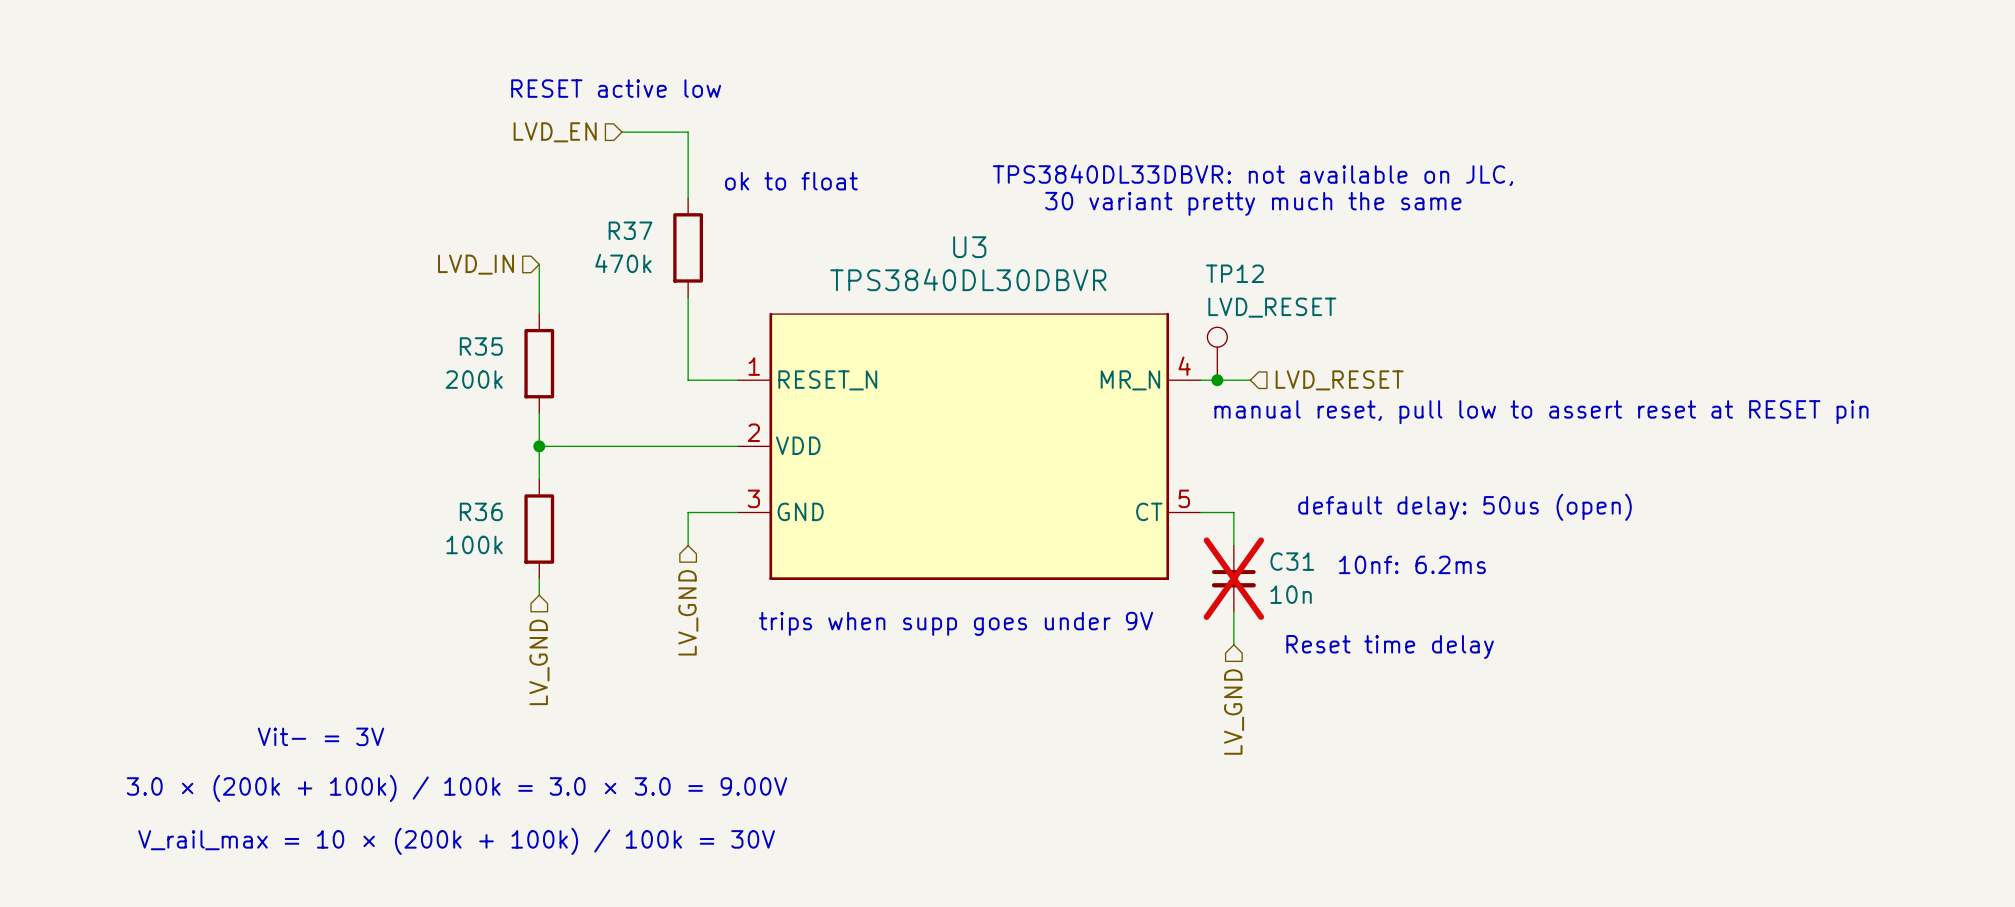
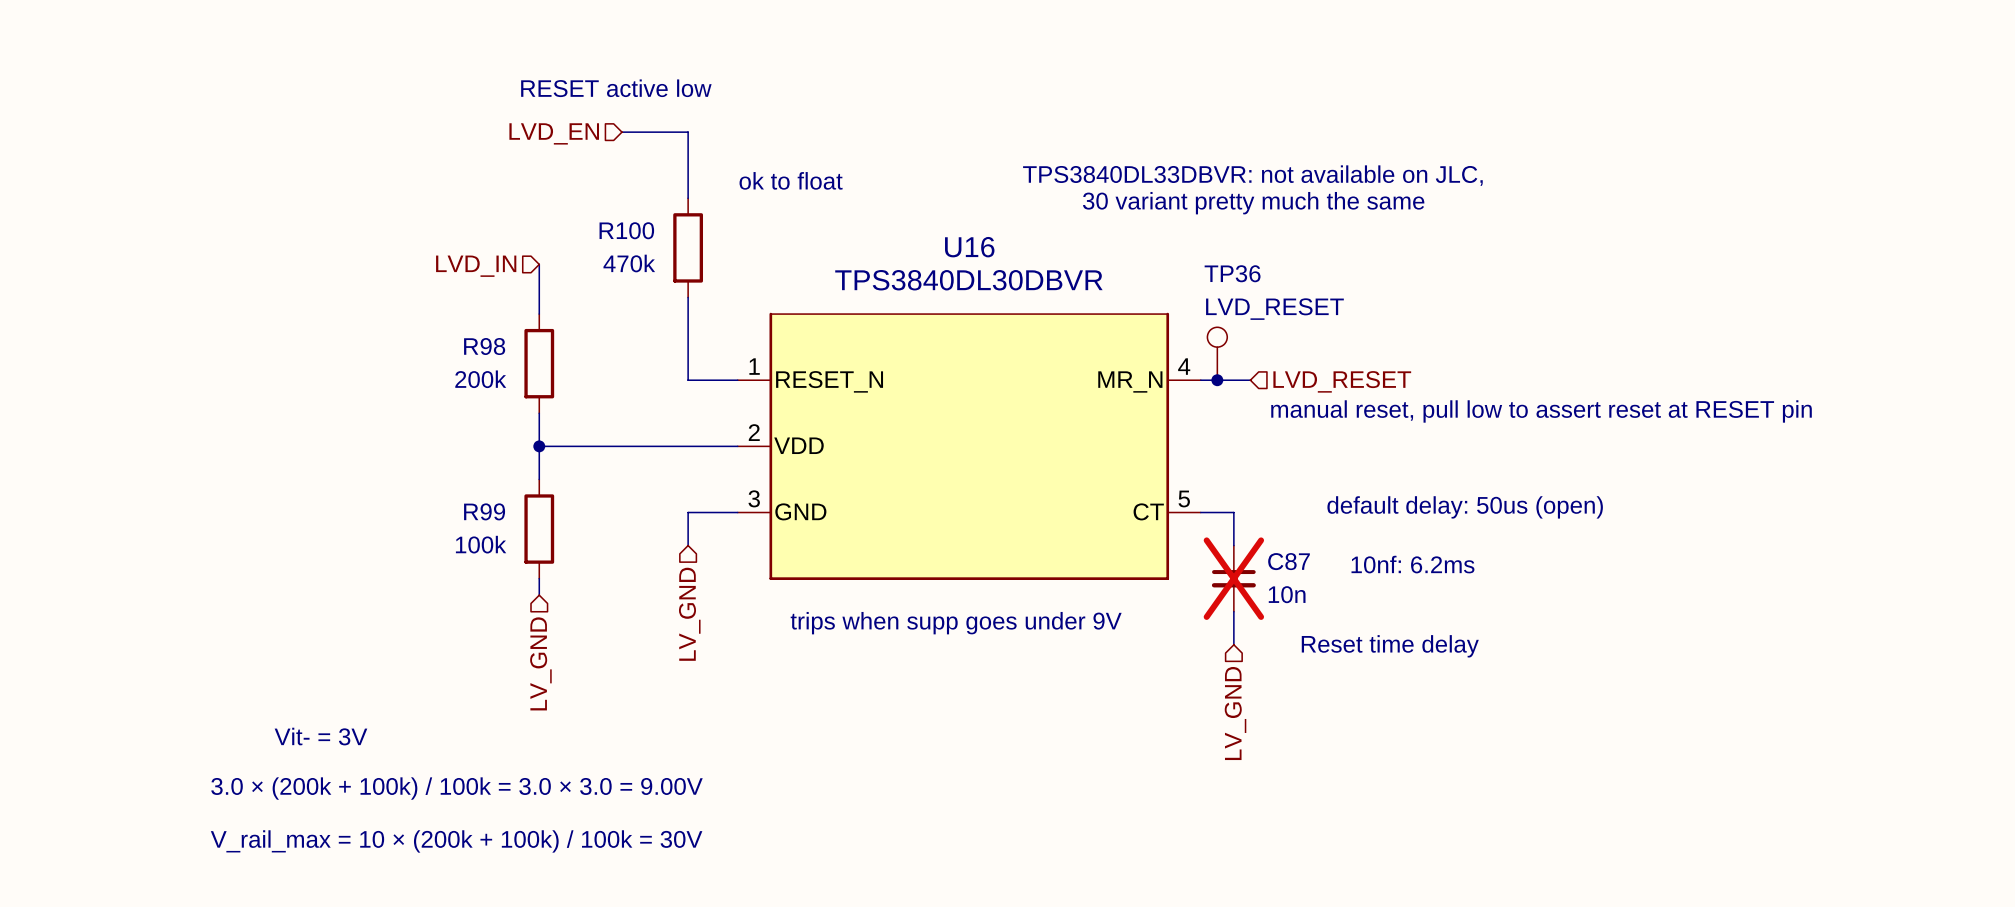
R37 name: R37 (630, 230) -> R100 (626, 230)
U3 name: U3 (969, 247) -> U16 (969, 247)
TP12 name: TP12 (1234, 273) -> TP36 (1232, 273)
R35 name: R35 (481, 346) -> R98 (484, 346)
R36 name: R36 (481, 511) -> R99 (484, 511)
C31 name: C31 (1292, 561) -> C87 (1289, 561)

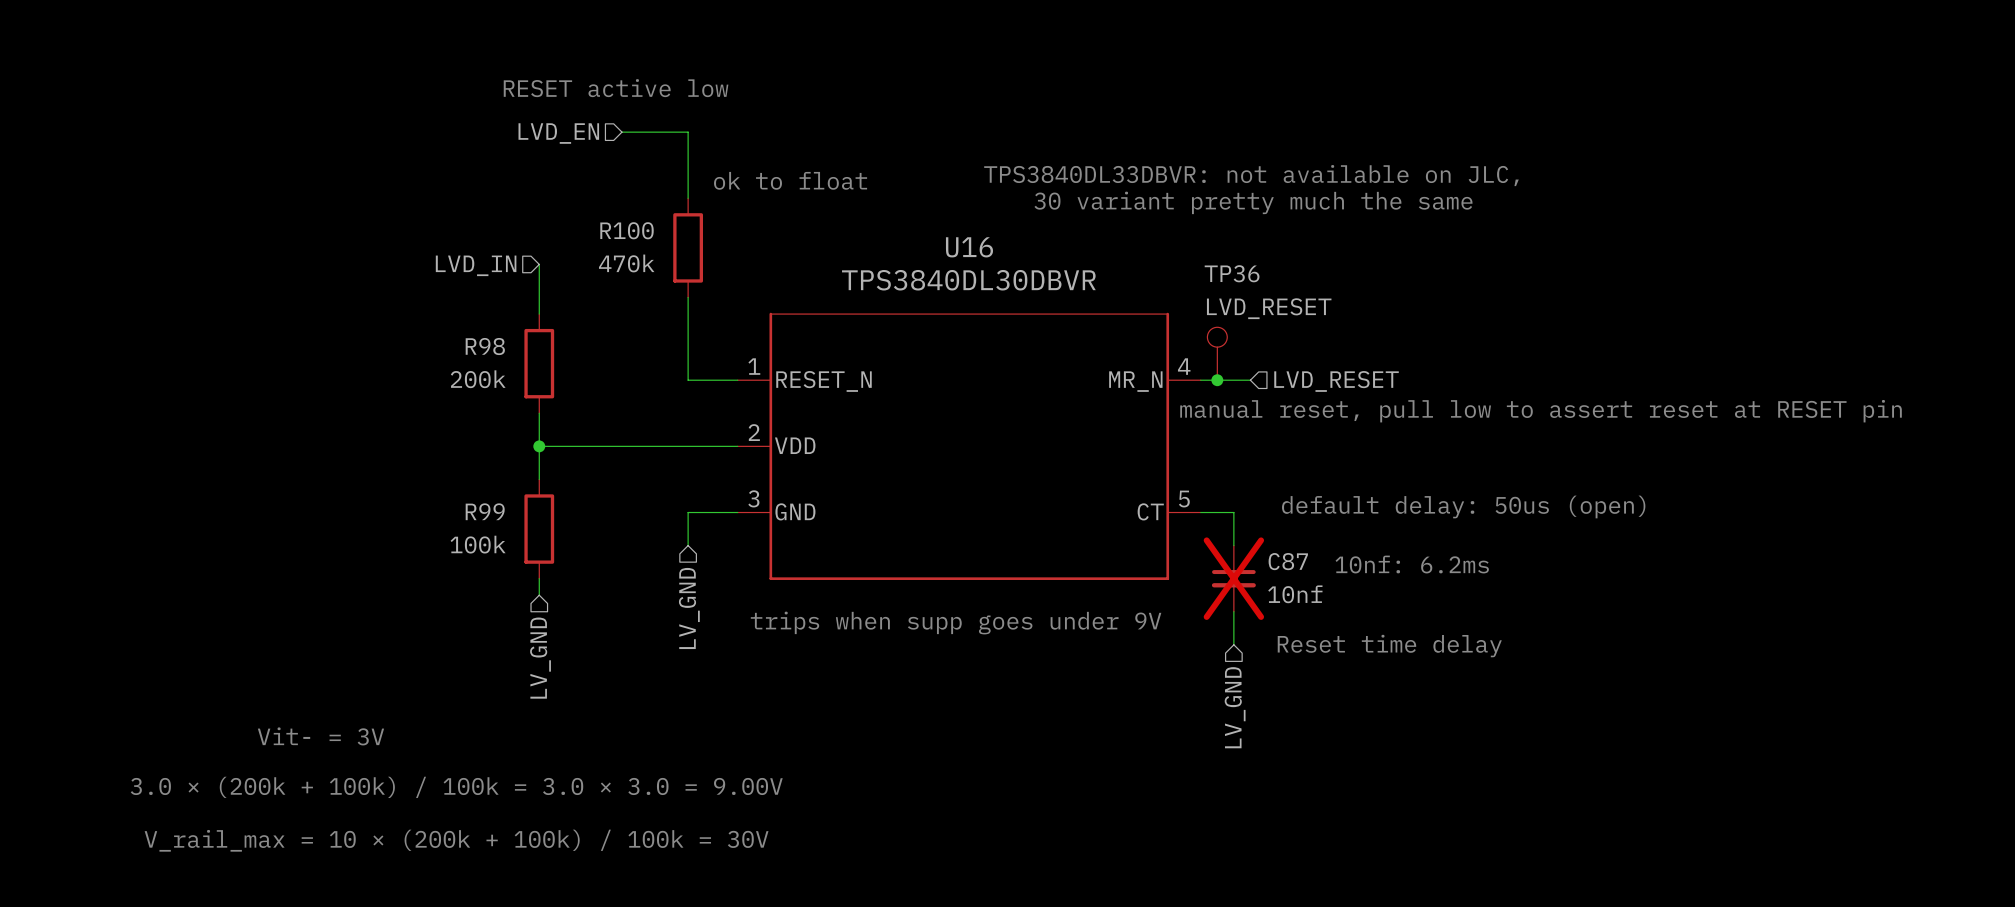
C87 value: 10n (1287, 594) -> 10nf (1295, 594)

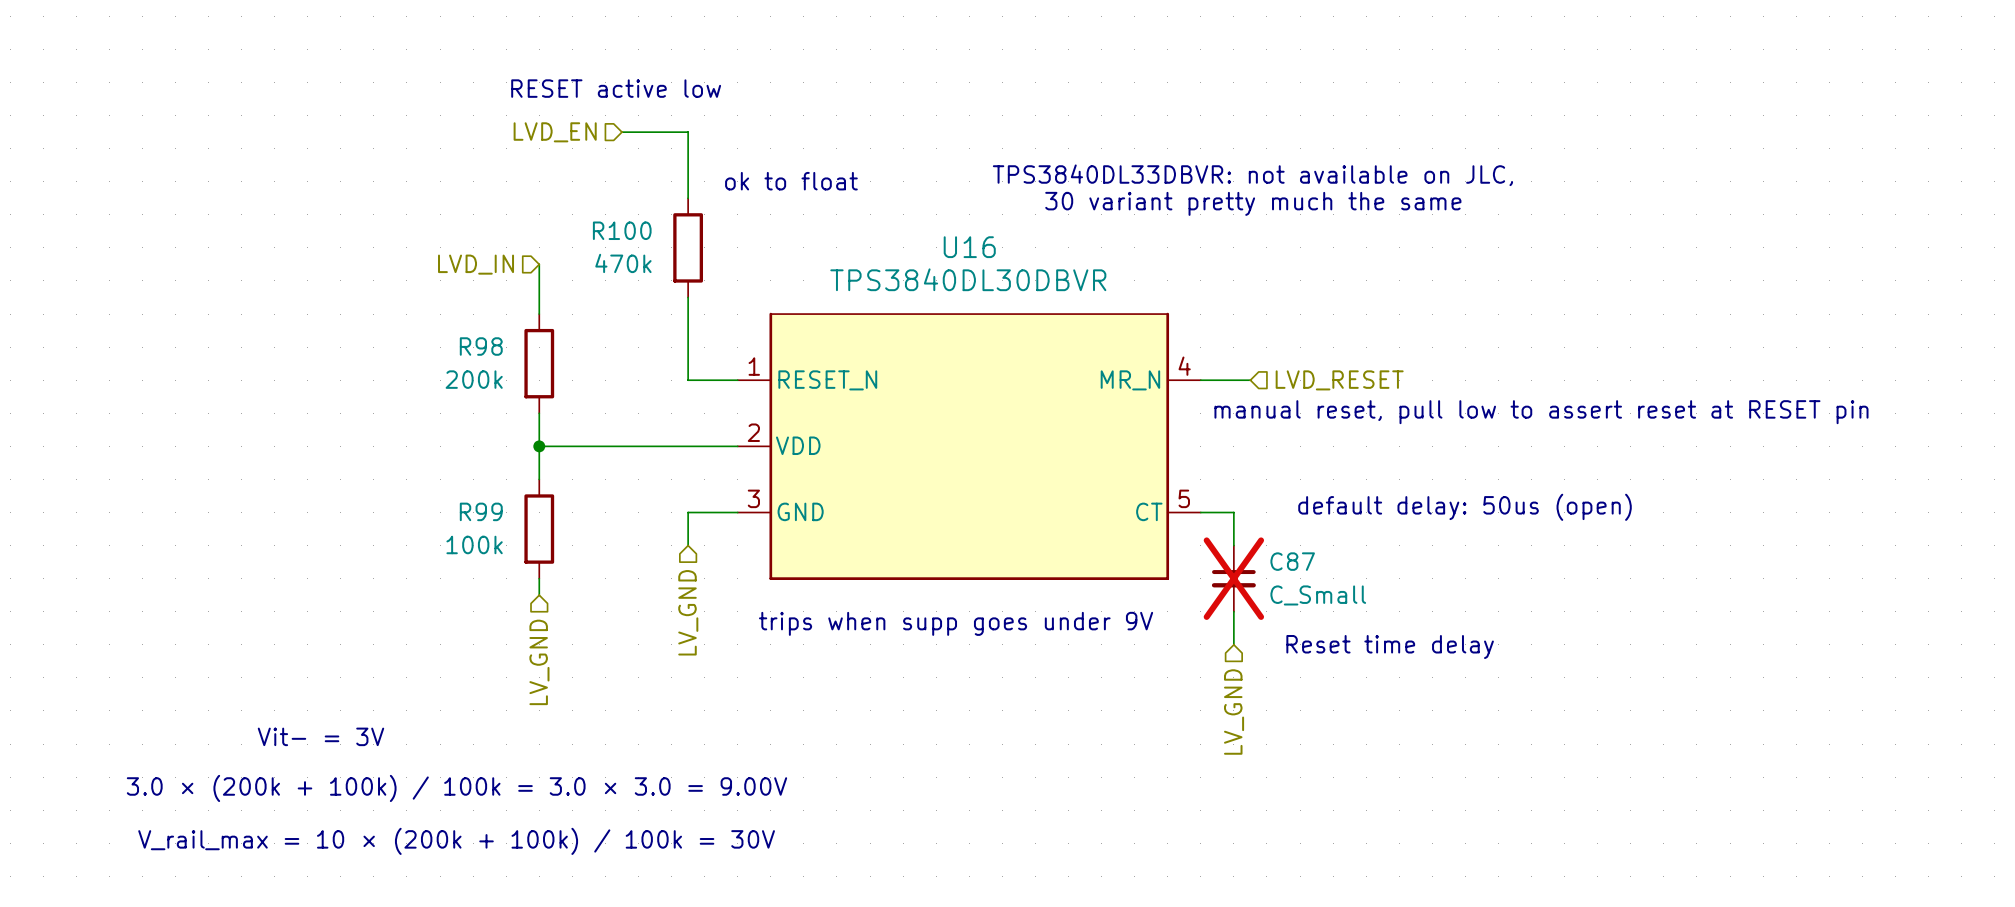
TP36: LVD_RESET (1217, 353) -> none
junction: (1217, 380) -> none
text: 10nf: 6.2ms (1412, 564) -> none
C87 value: 10nf (1295, 594) -> C_Small (1318, 595)

